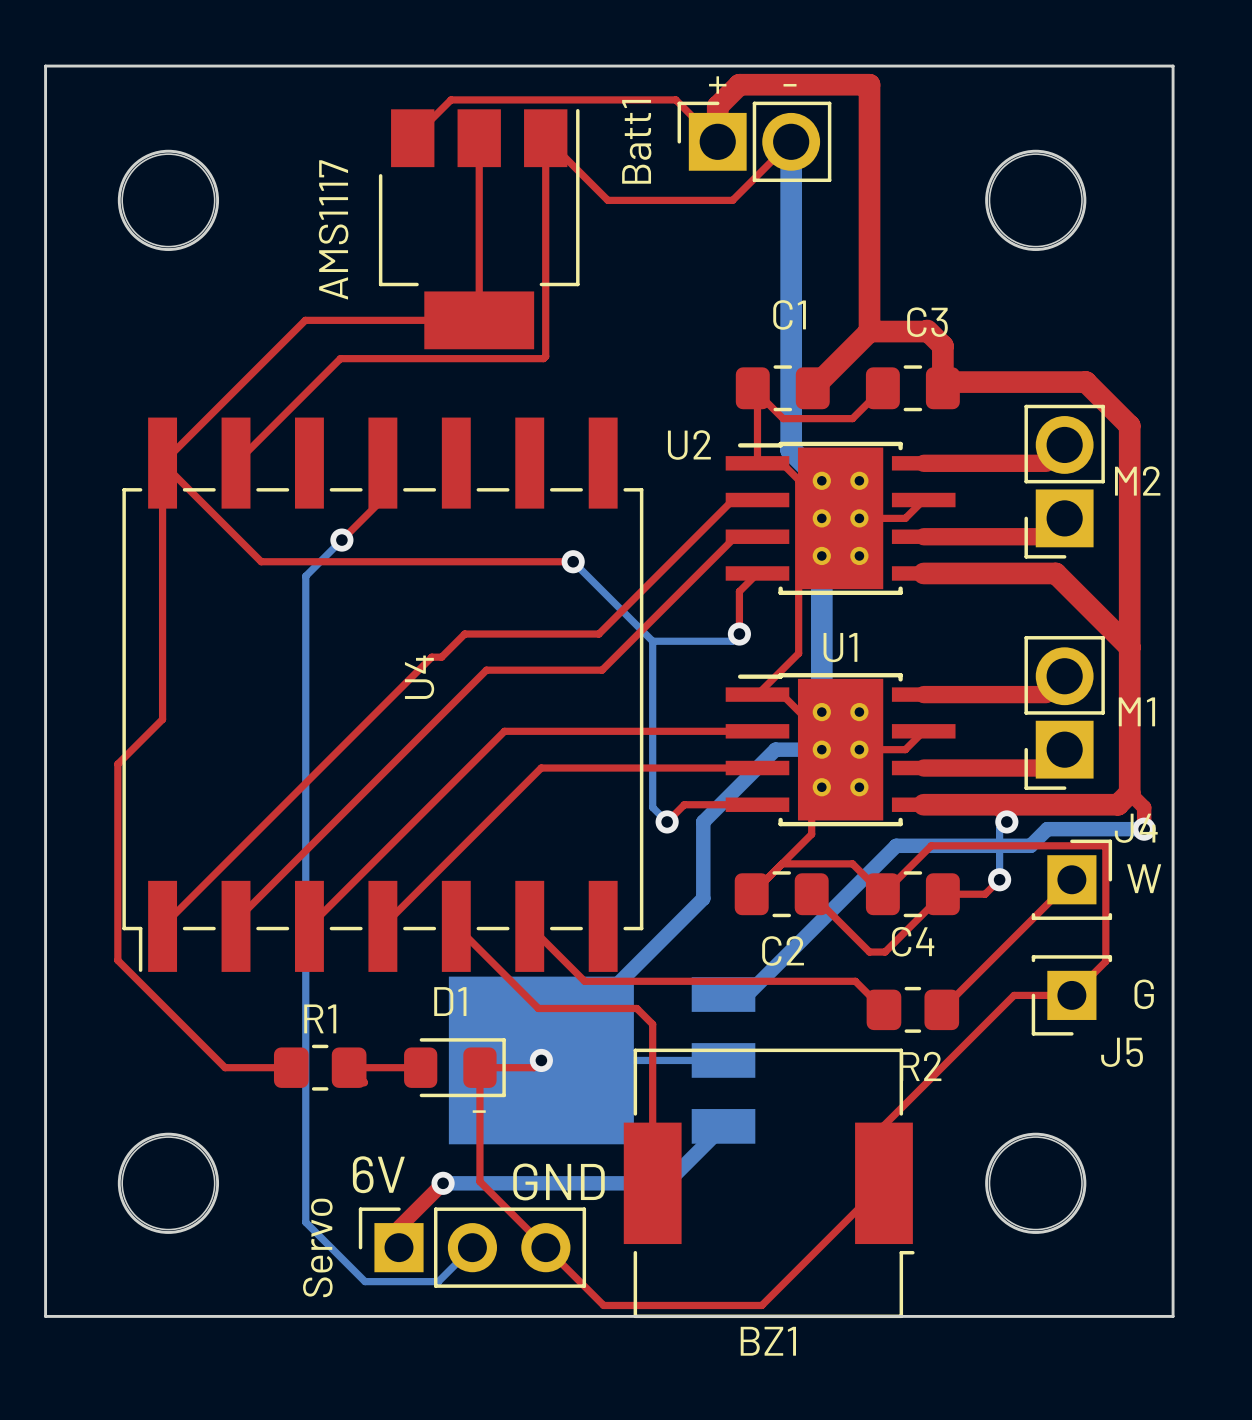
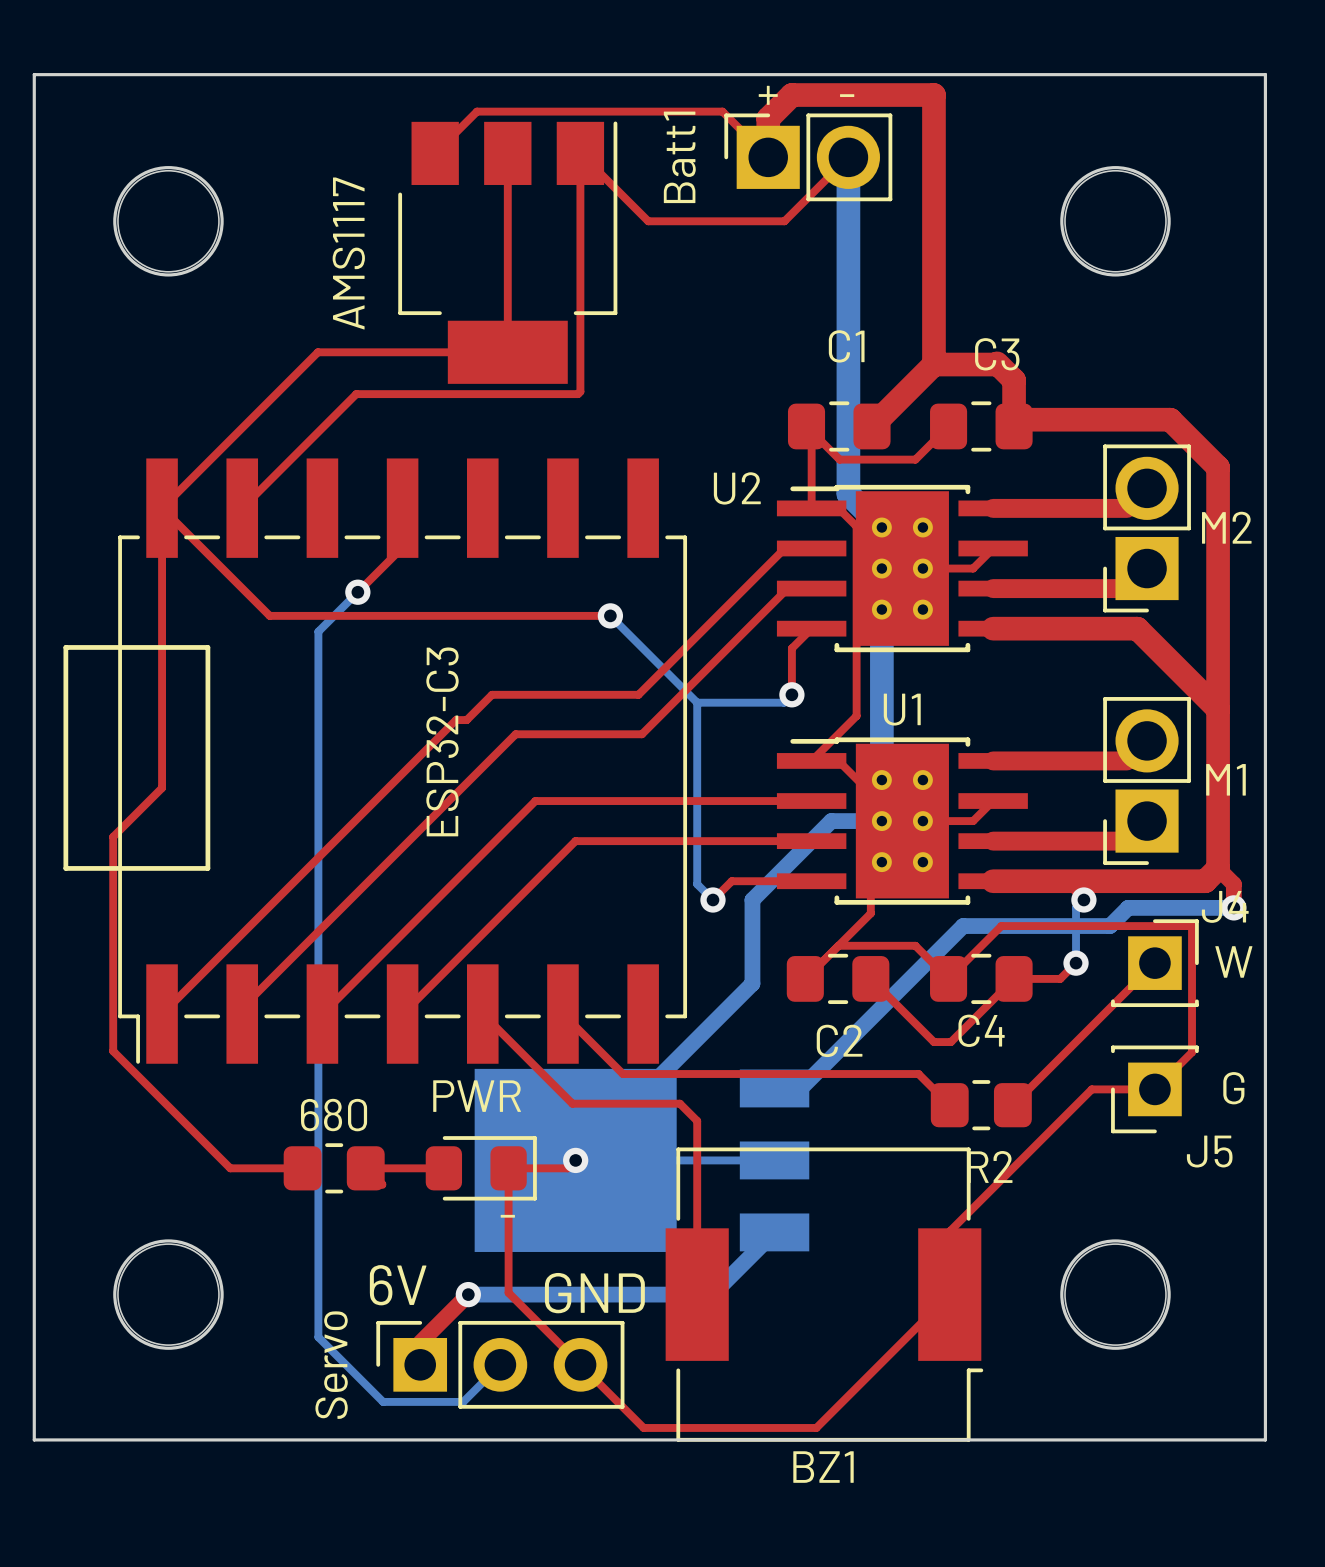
line: none -> (65, 647) (207, 647) (207, 868) (65, 868) (65, 647)
U4 name: U4 (419, 677) -> ESP32-C3 (442, 741)
D1 name: D1 (450, 1001) -> PWR (477, 1096)
R1 name: R1 (320, 1018) -> 680 (334, 1115)

